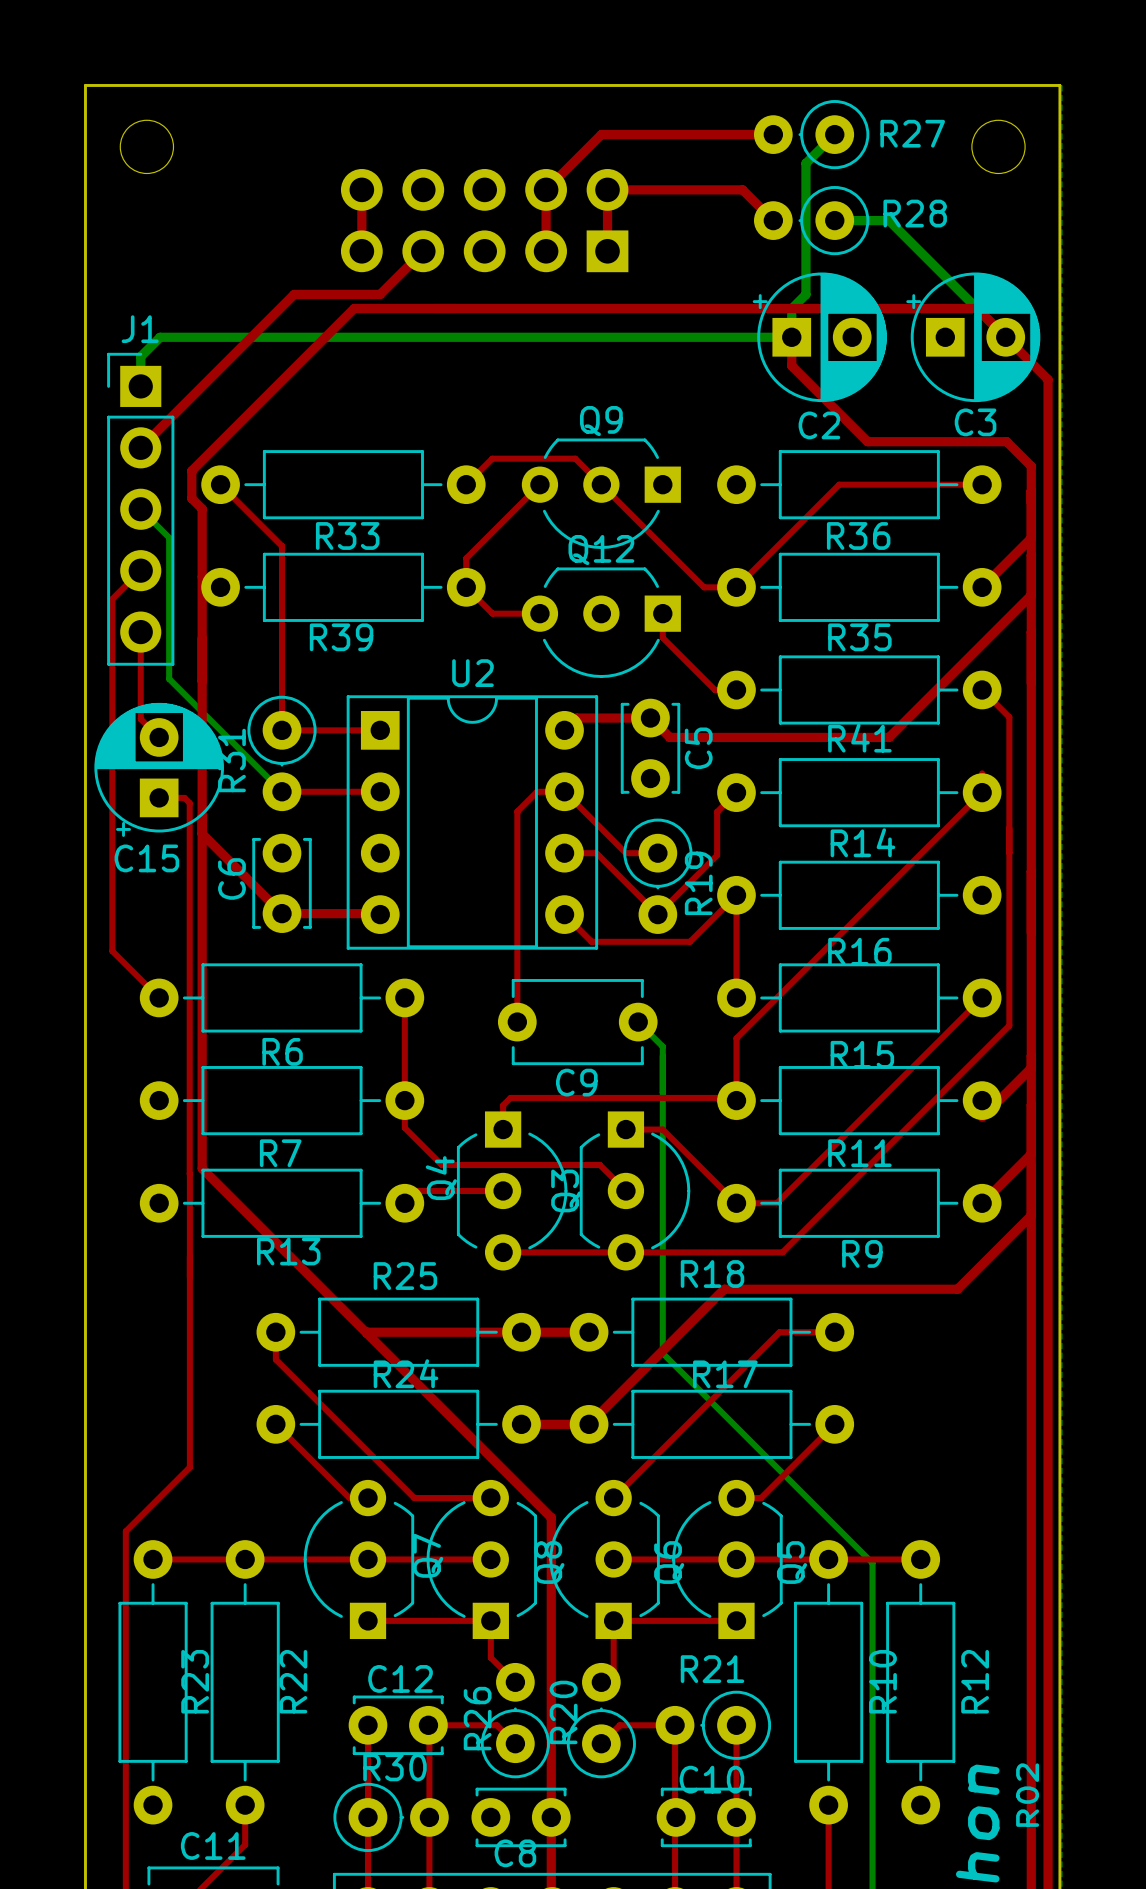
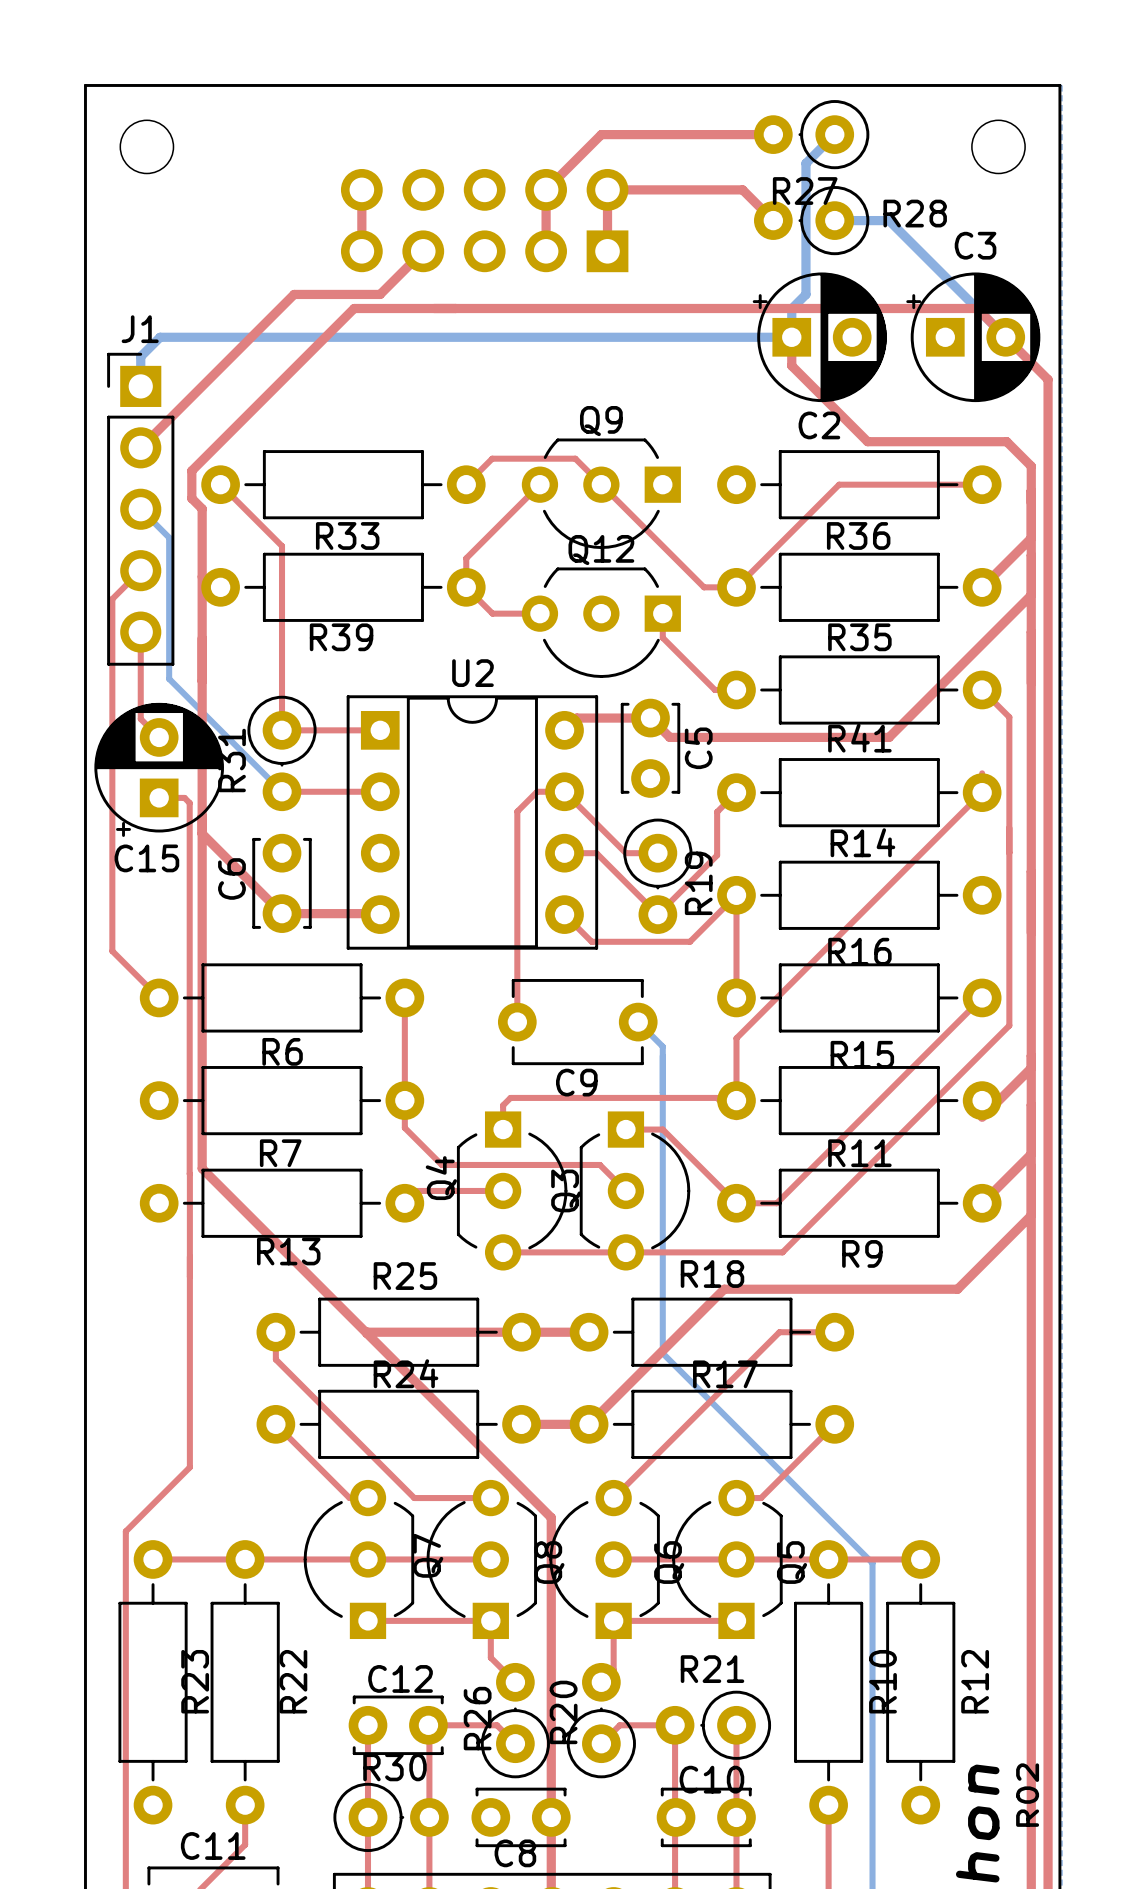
R27 name position: R27 (912, 133) -> R27 (805, 191)
C3 name position: C3 (975, 422) -> C3 (975, 245)

